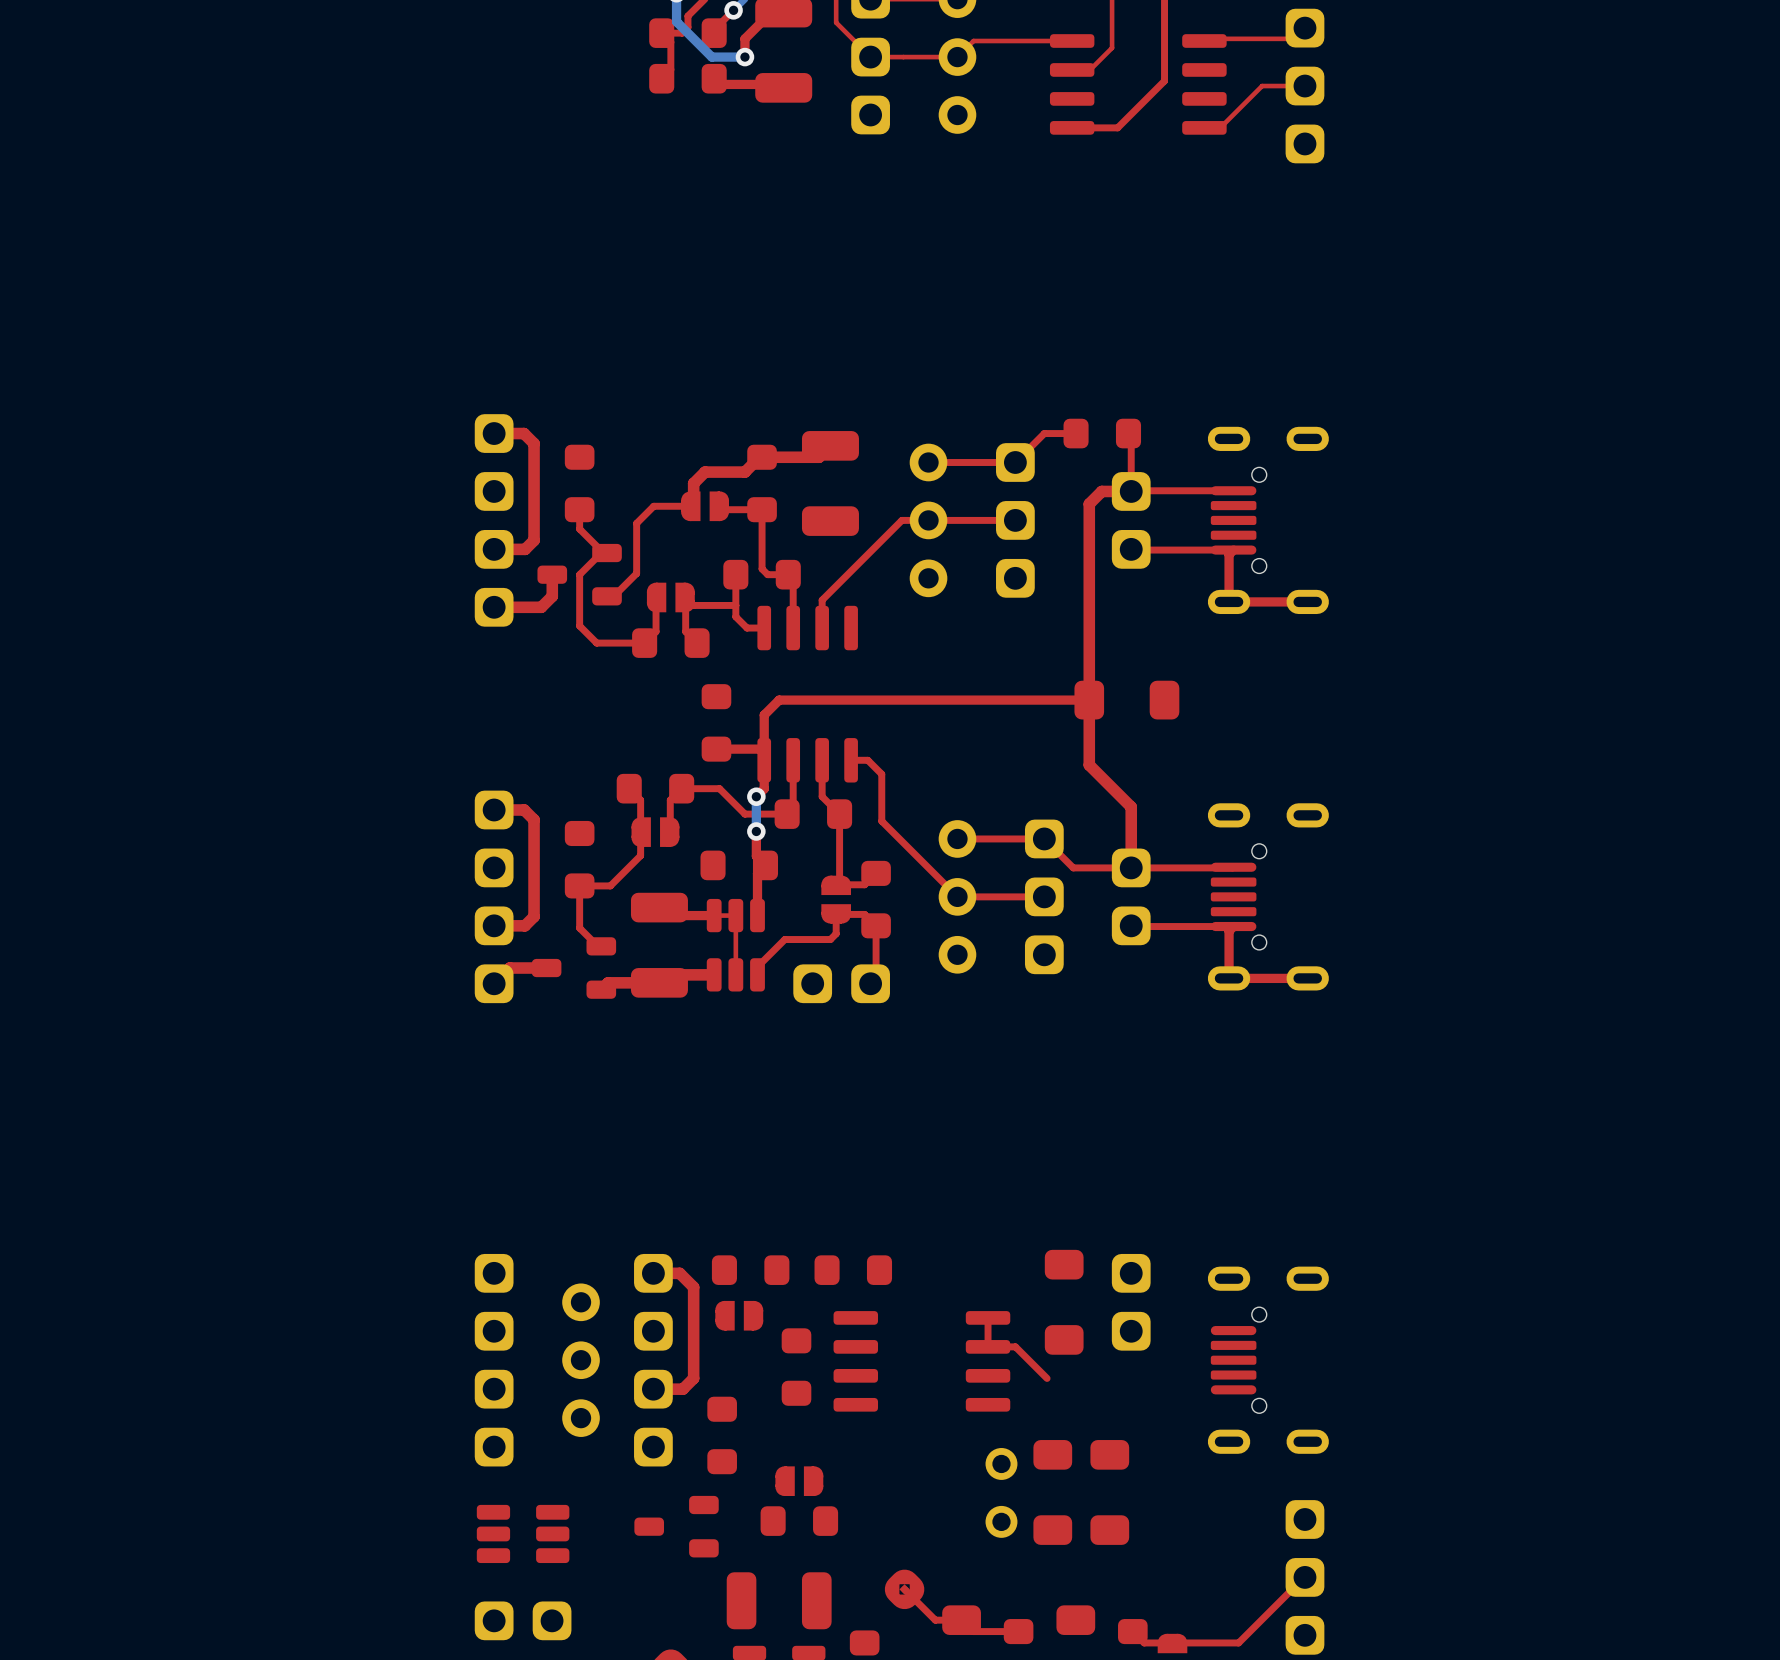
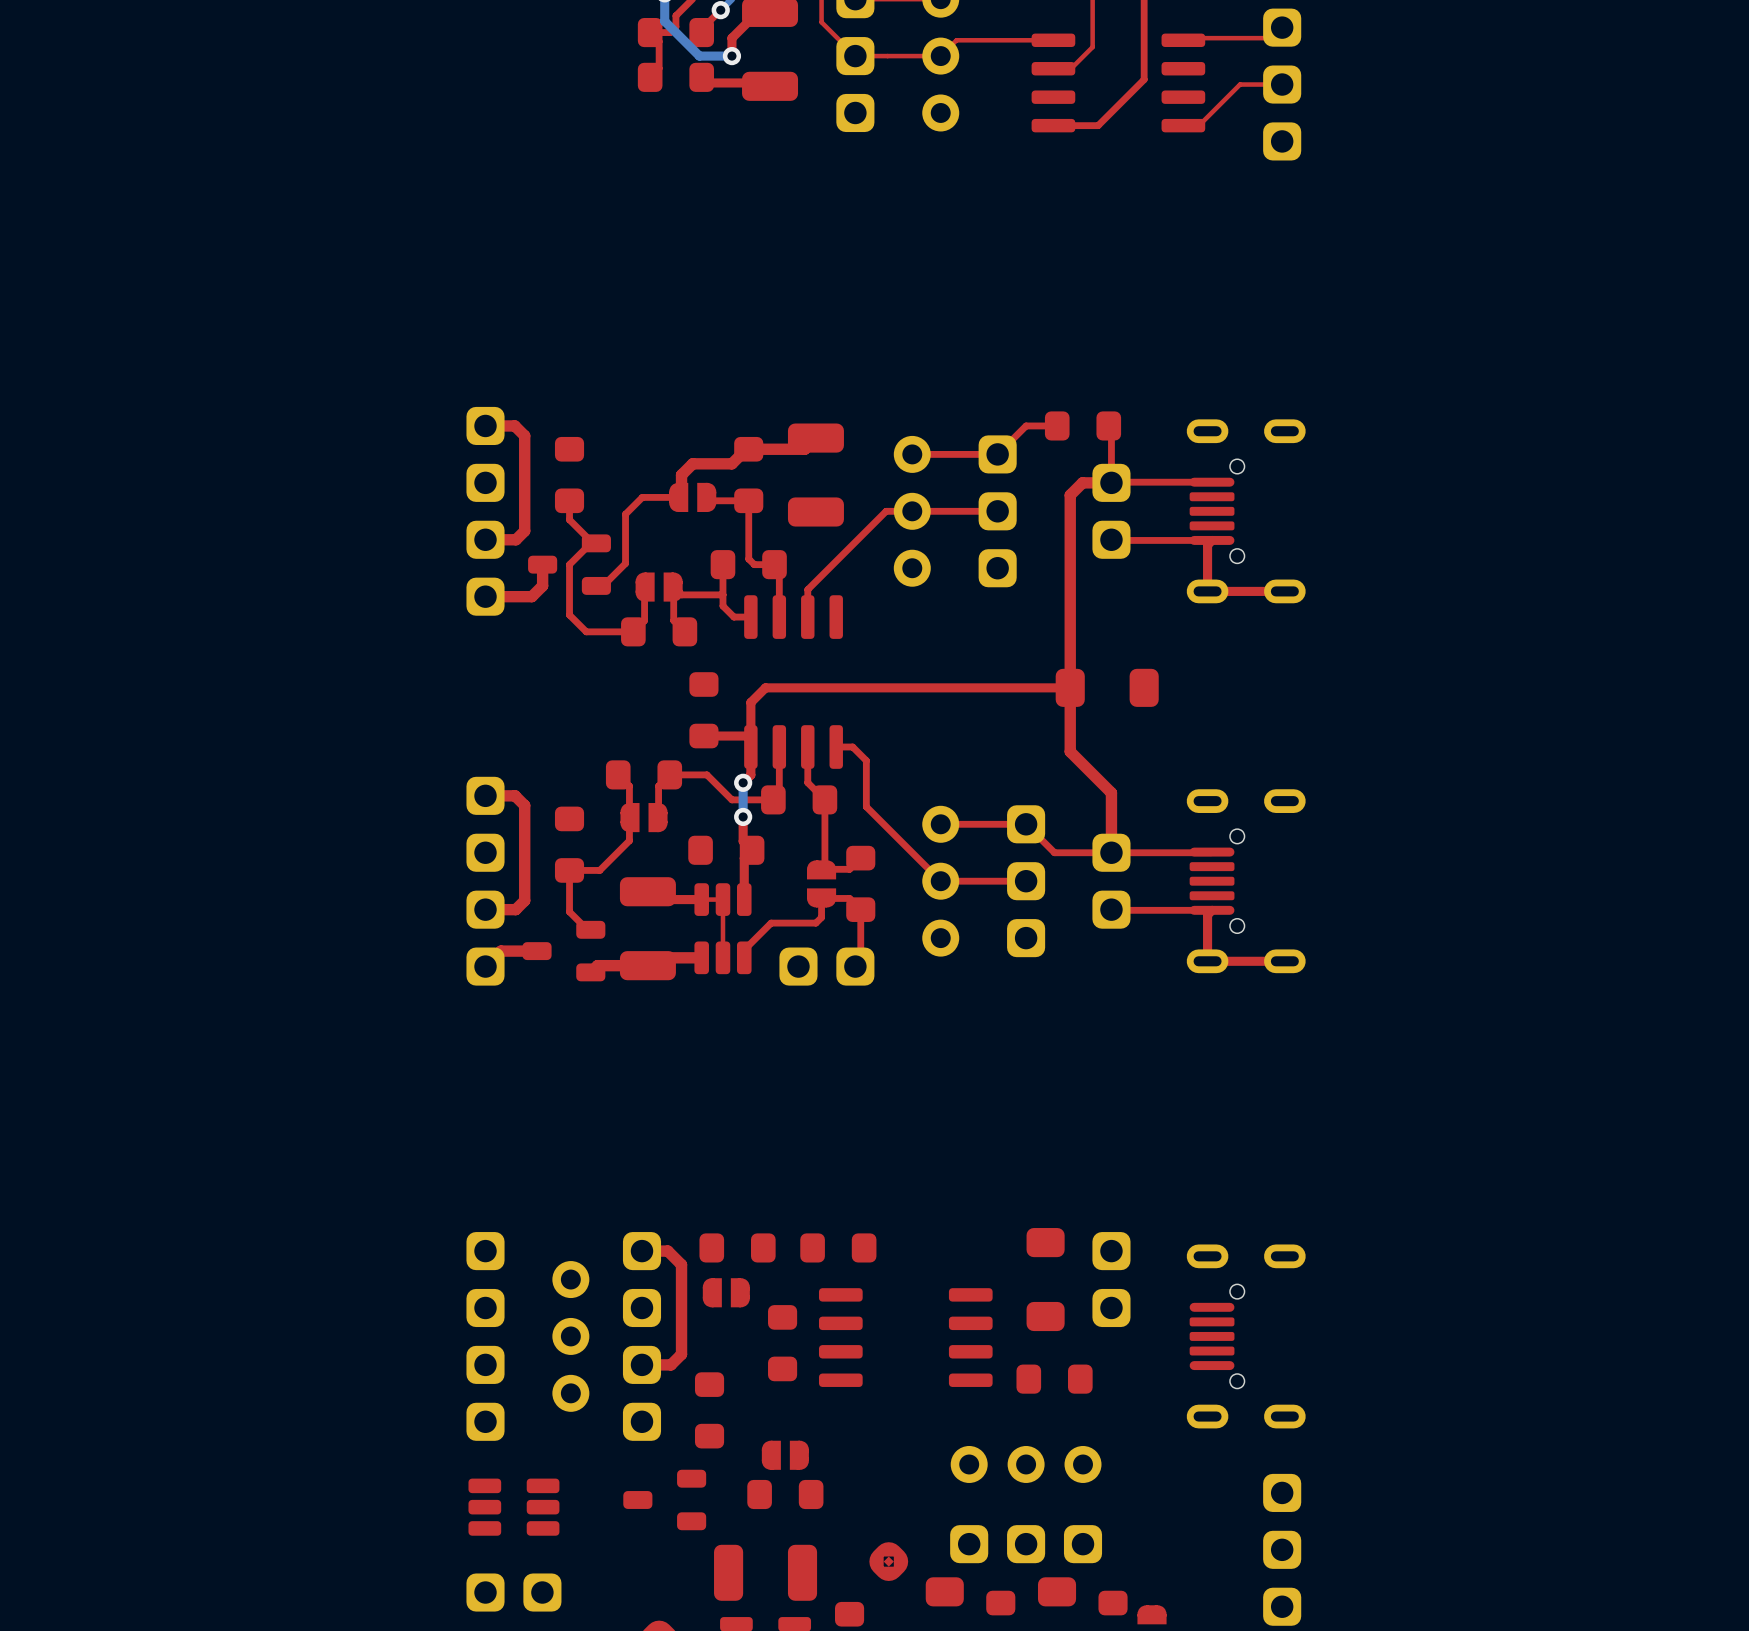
top track: (988, 1317) (988, 1346) (1015, 1346) (1047, 1378) -> none
part: none -> (1054, 1379)
part footprint: [1033, 1440, 1073, 1545] -> [950, 1445, 1102, 1483]
part: (1001, 1492) -> none
part: (1109, 1492) -> none
part: none -> (1026, 1544)
top track: (1304, 1577) (1238, 1642) (1144, 1642) (1132, 1631) -> none
top track: (904, 1589) (935, 1620) (961, 1620) (972, 1631) (1018, 1631) -> none

